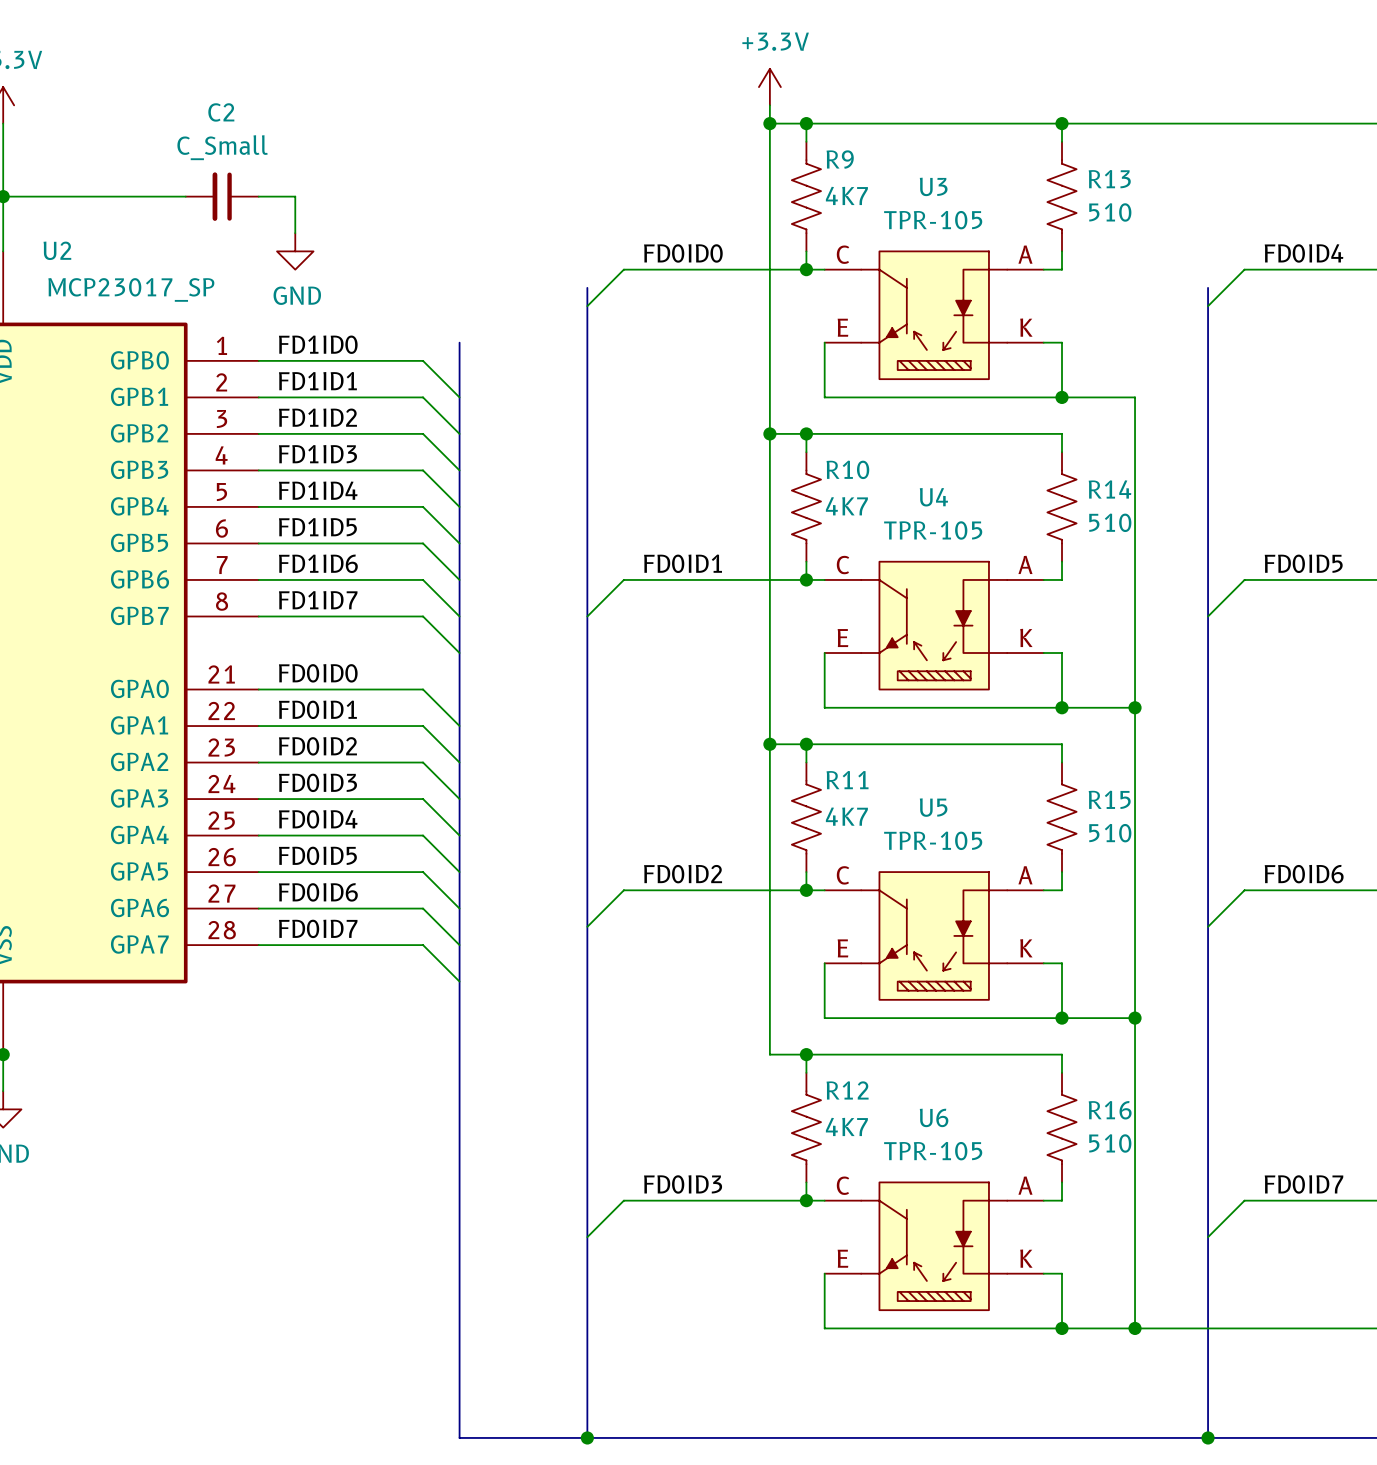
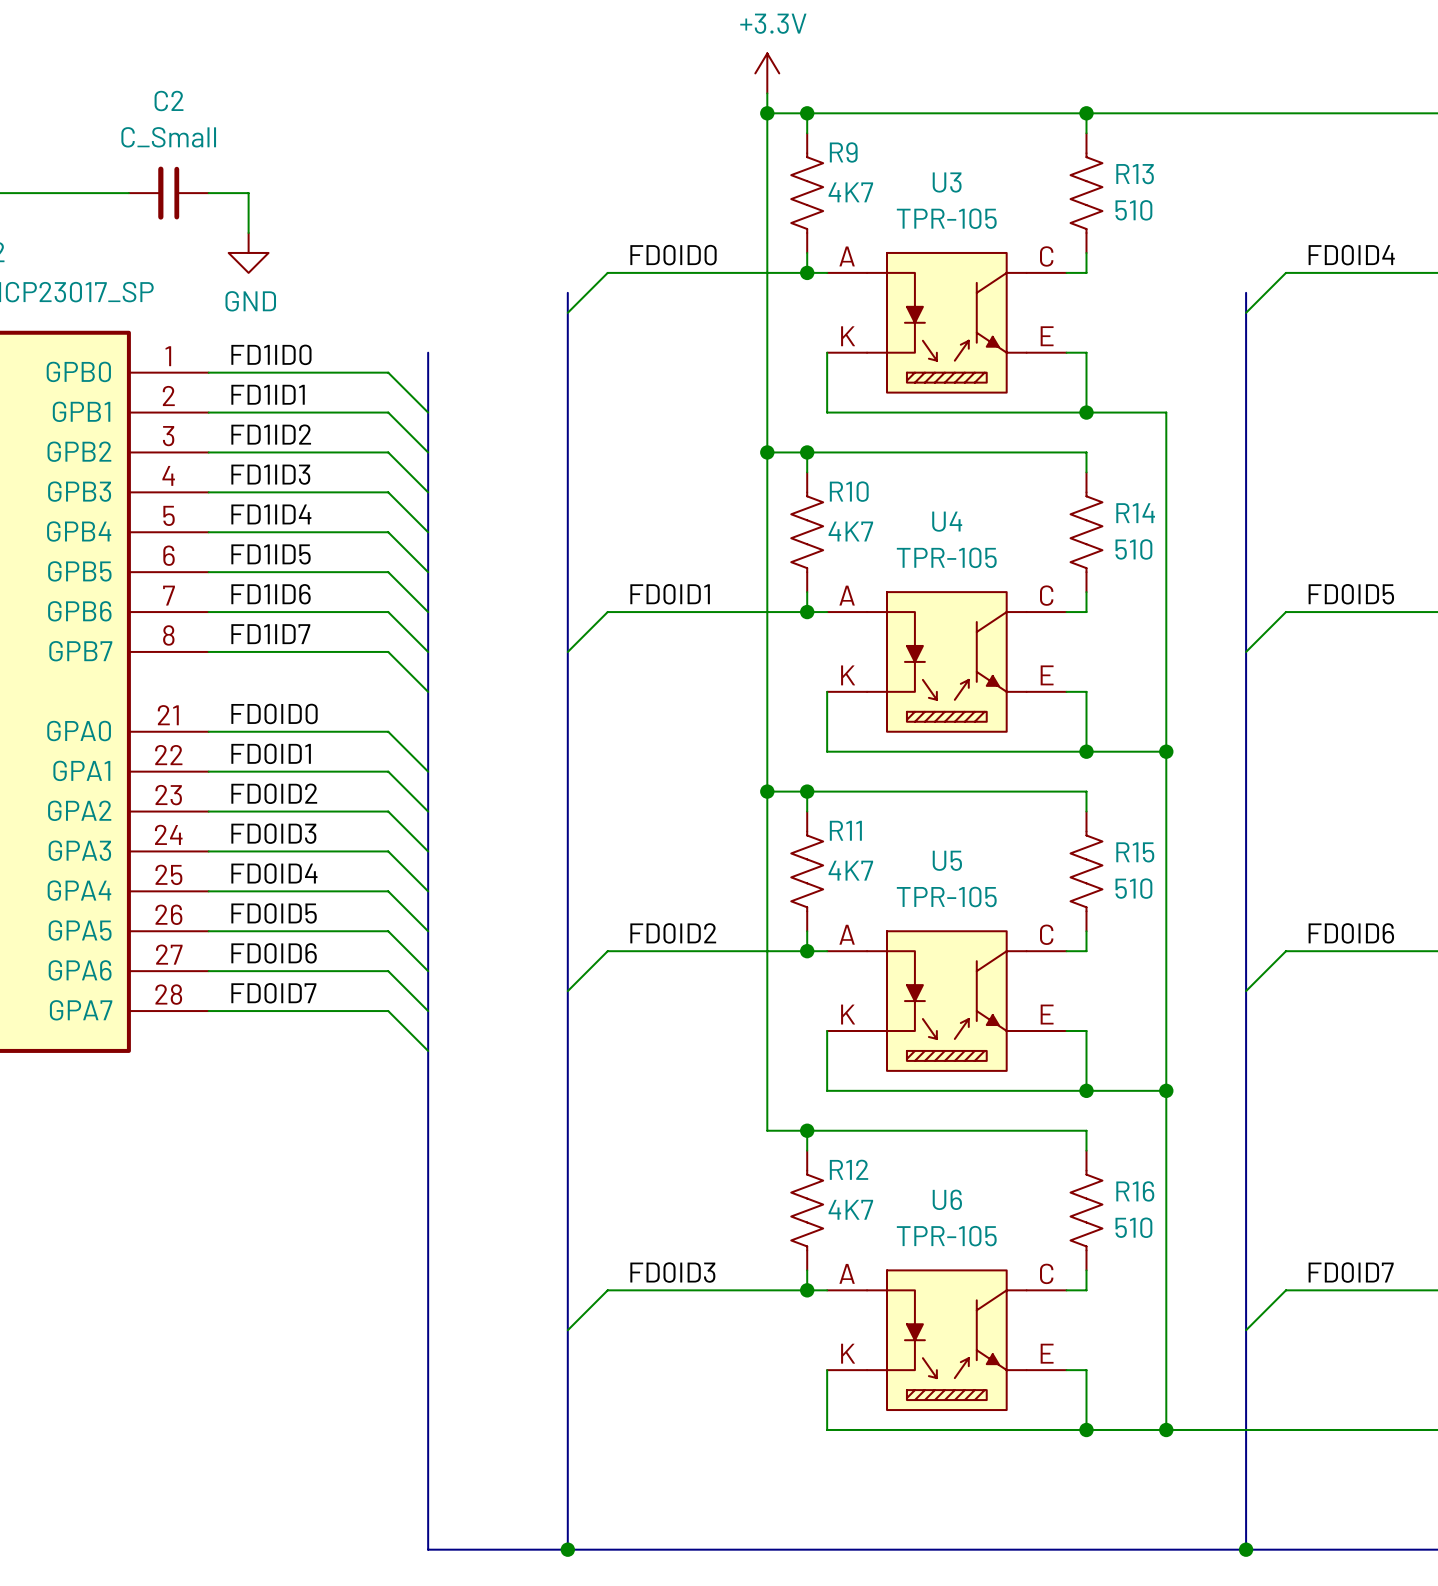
U3 flip: as is (934, 315) -> left-right (946, 322)
U4 flip: as is (934, 625) -> left-right (946, 661)
U5 flip: as is (934, 935) -> left-right (946, 1001)
U6 flip: as is (934, 1246) -> left-right (946, 1340)

